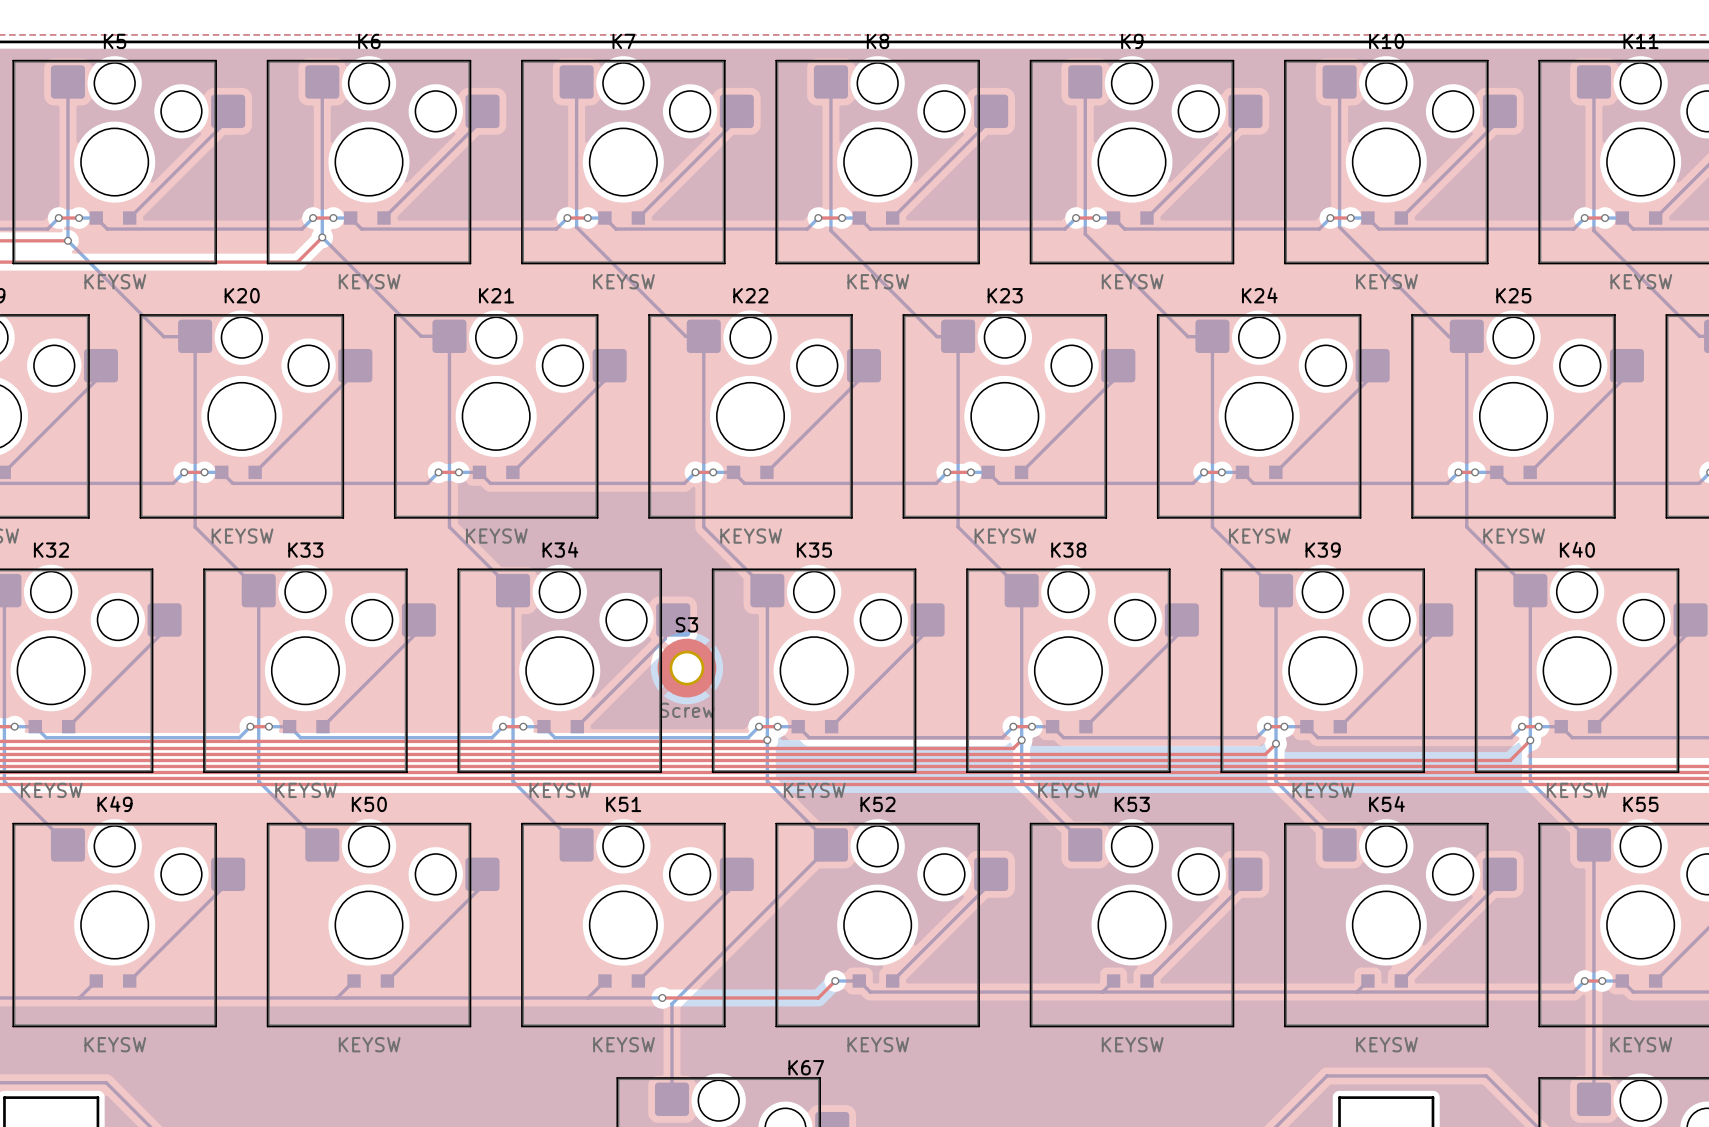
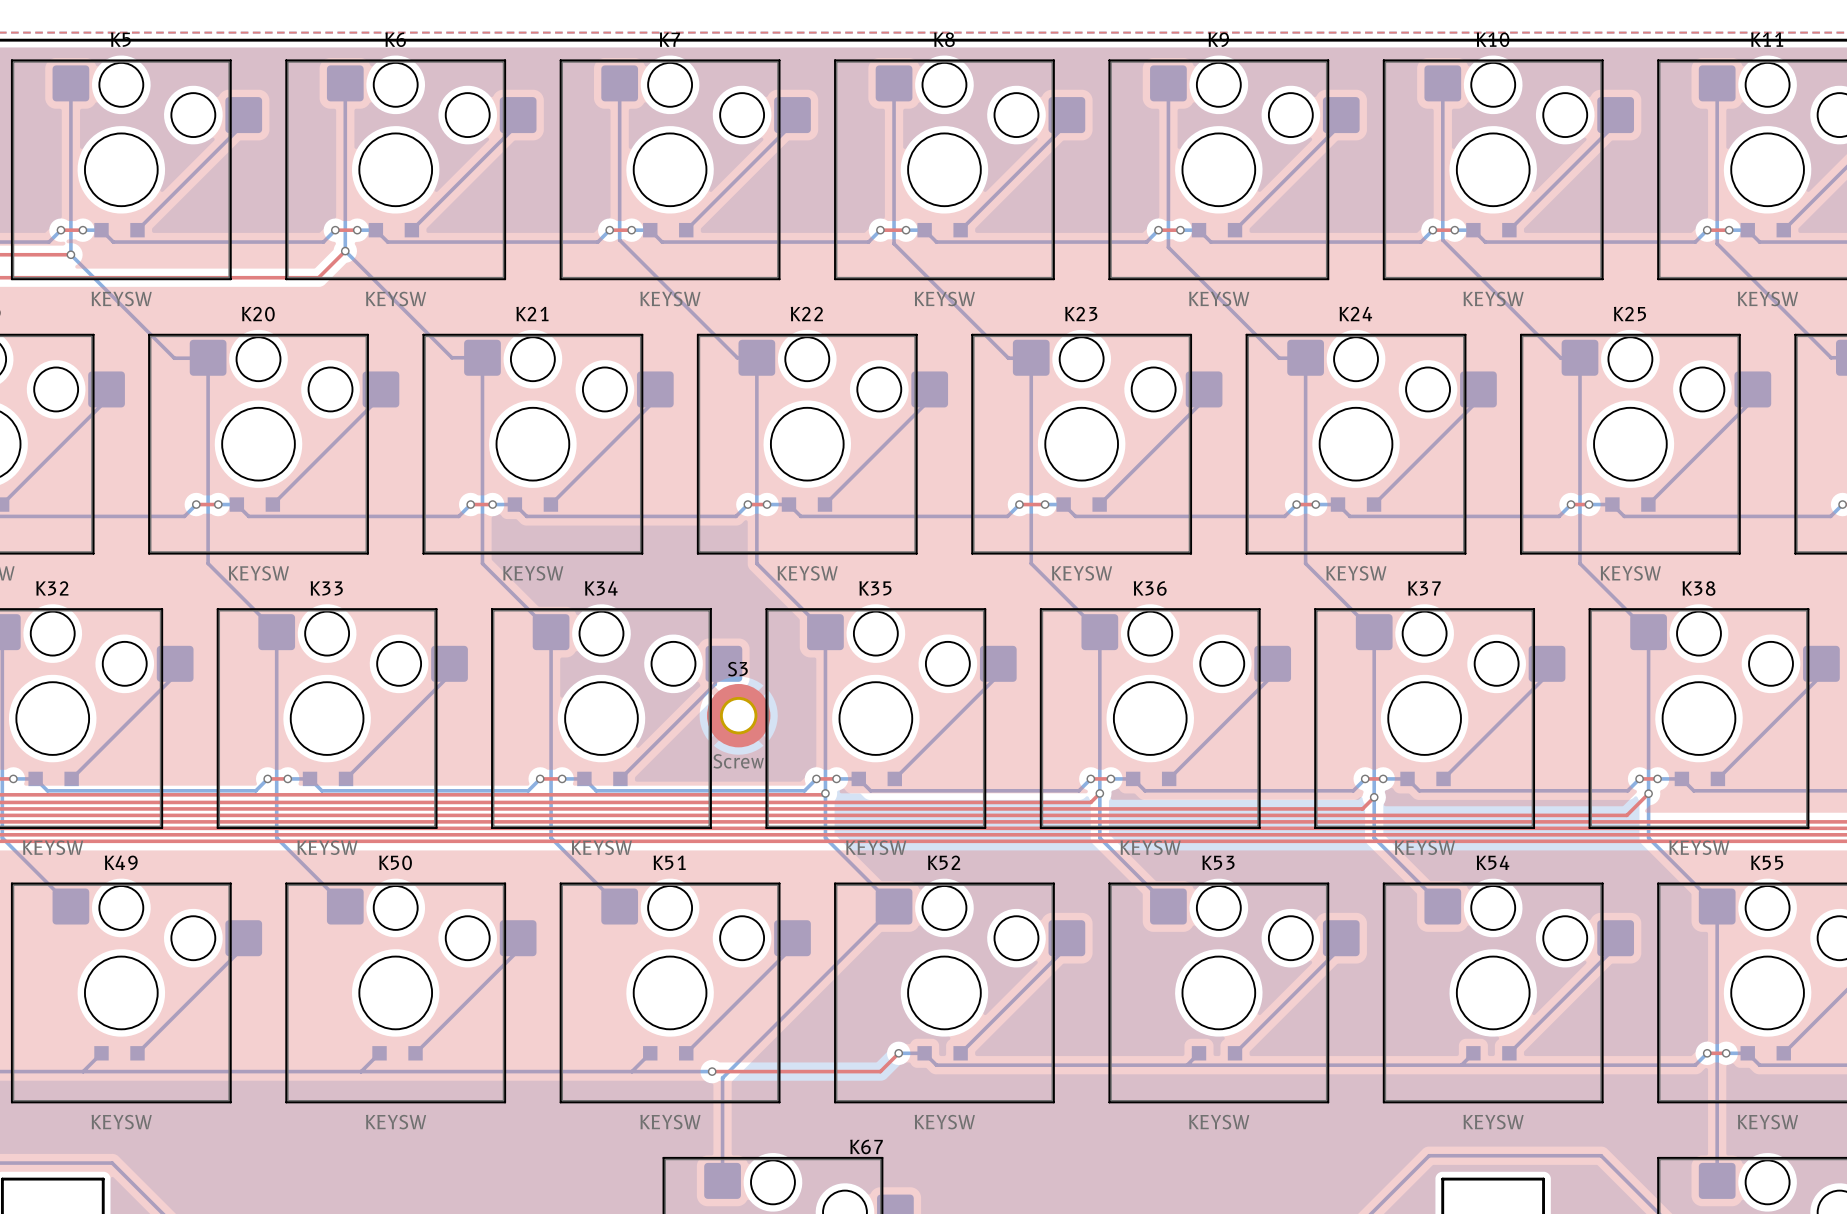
K40 name: K40 (1577, 549) -> K38 (1698, 588)
K38 name: K38 (1068, 550) -> K36 (1150, 588)
K39 name: K39 (1323, 550) -> K37 (1424, 588)

